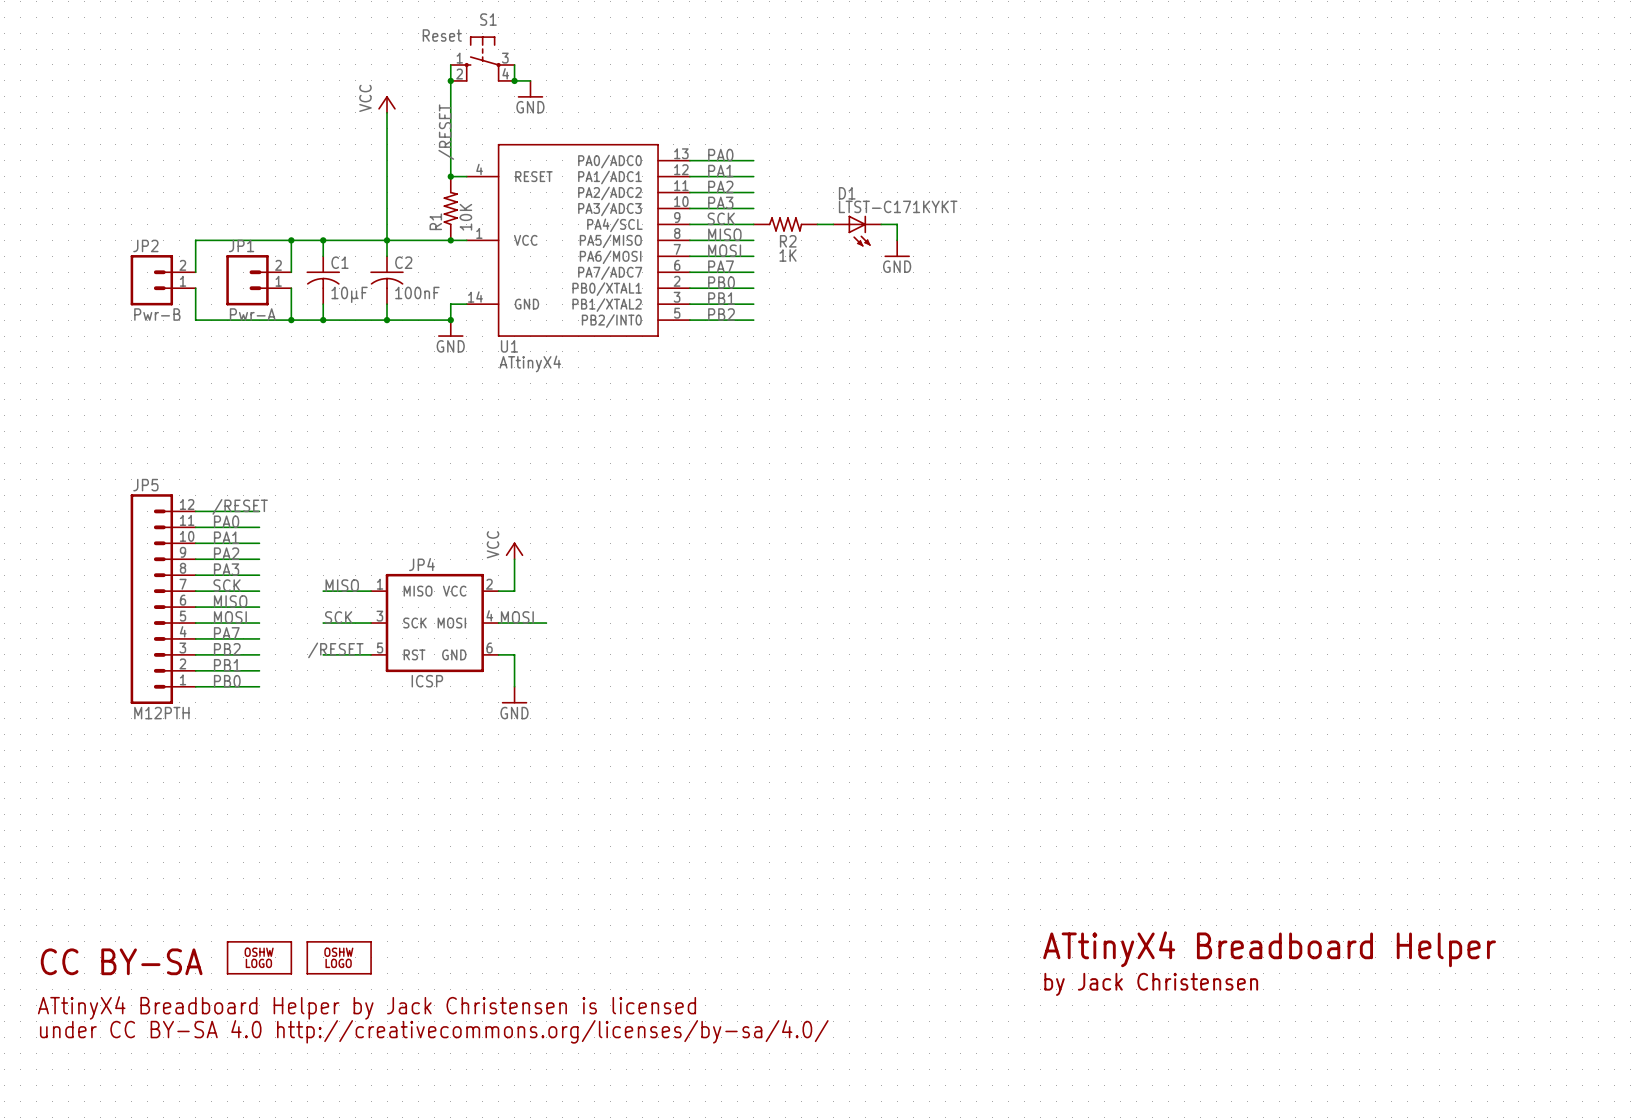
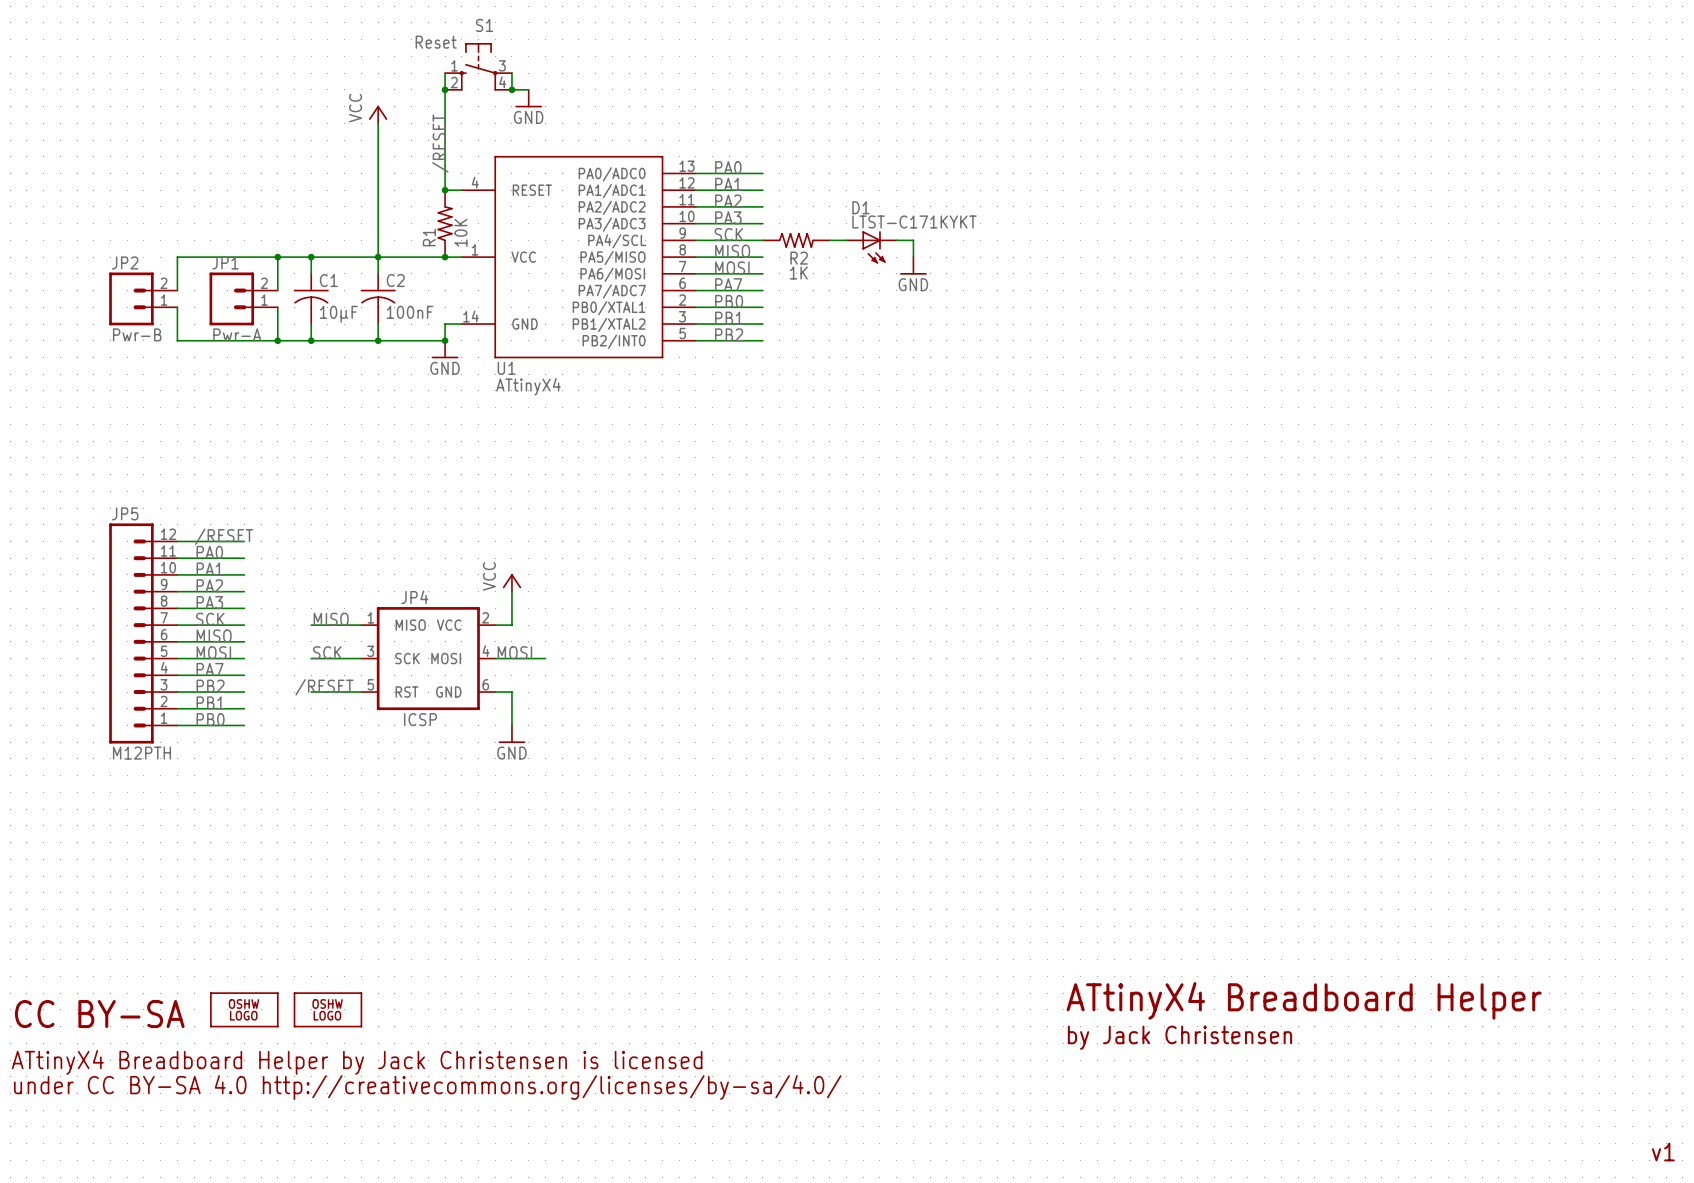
text: none -> v1 (1663, 1152)

